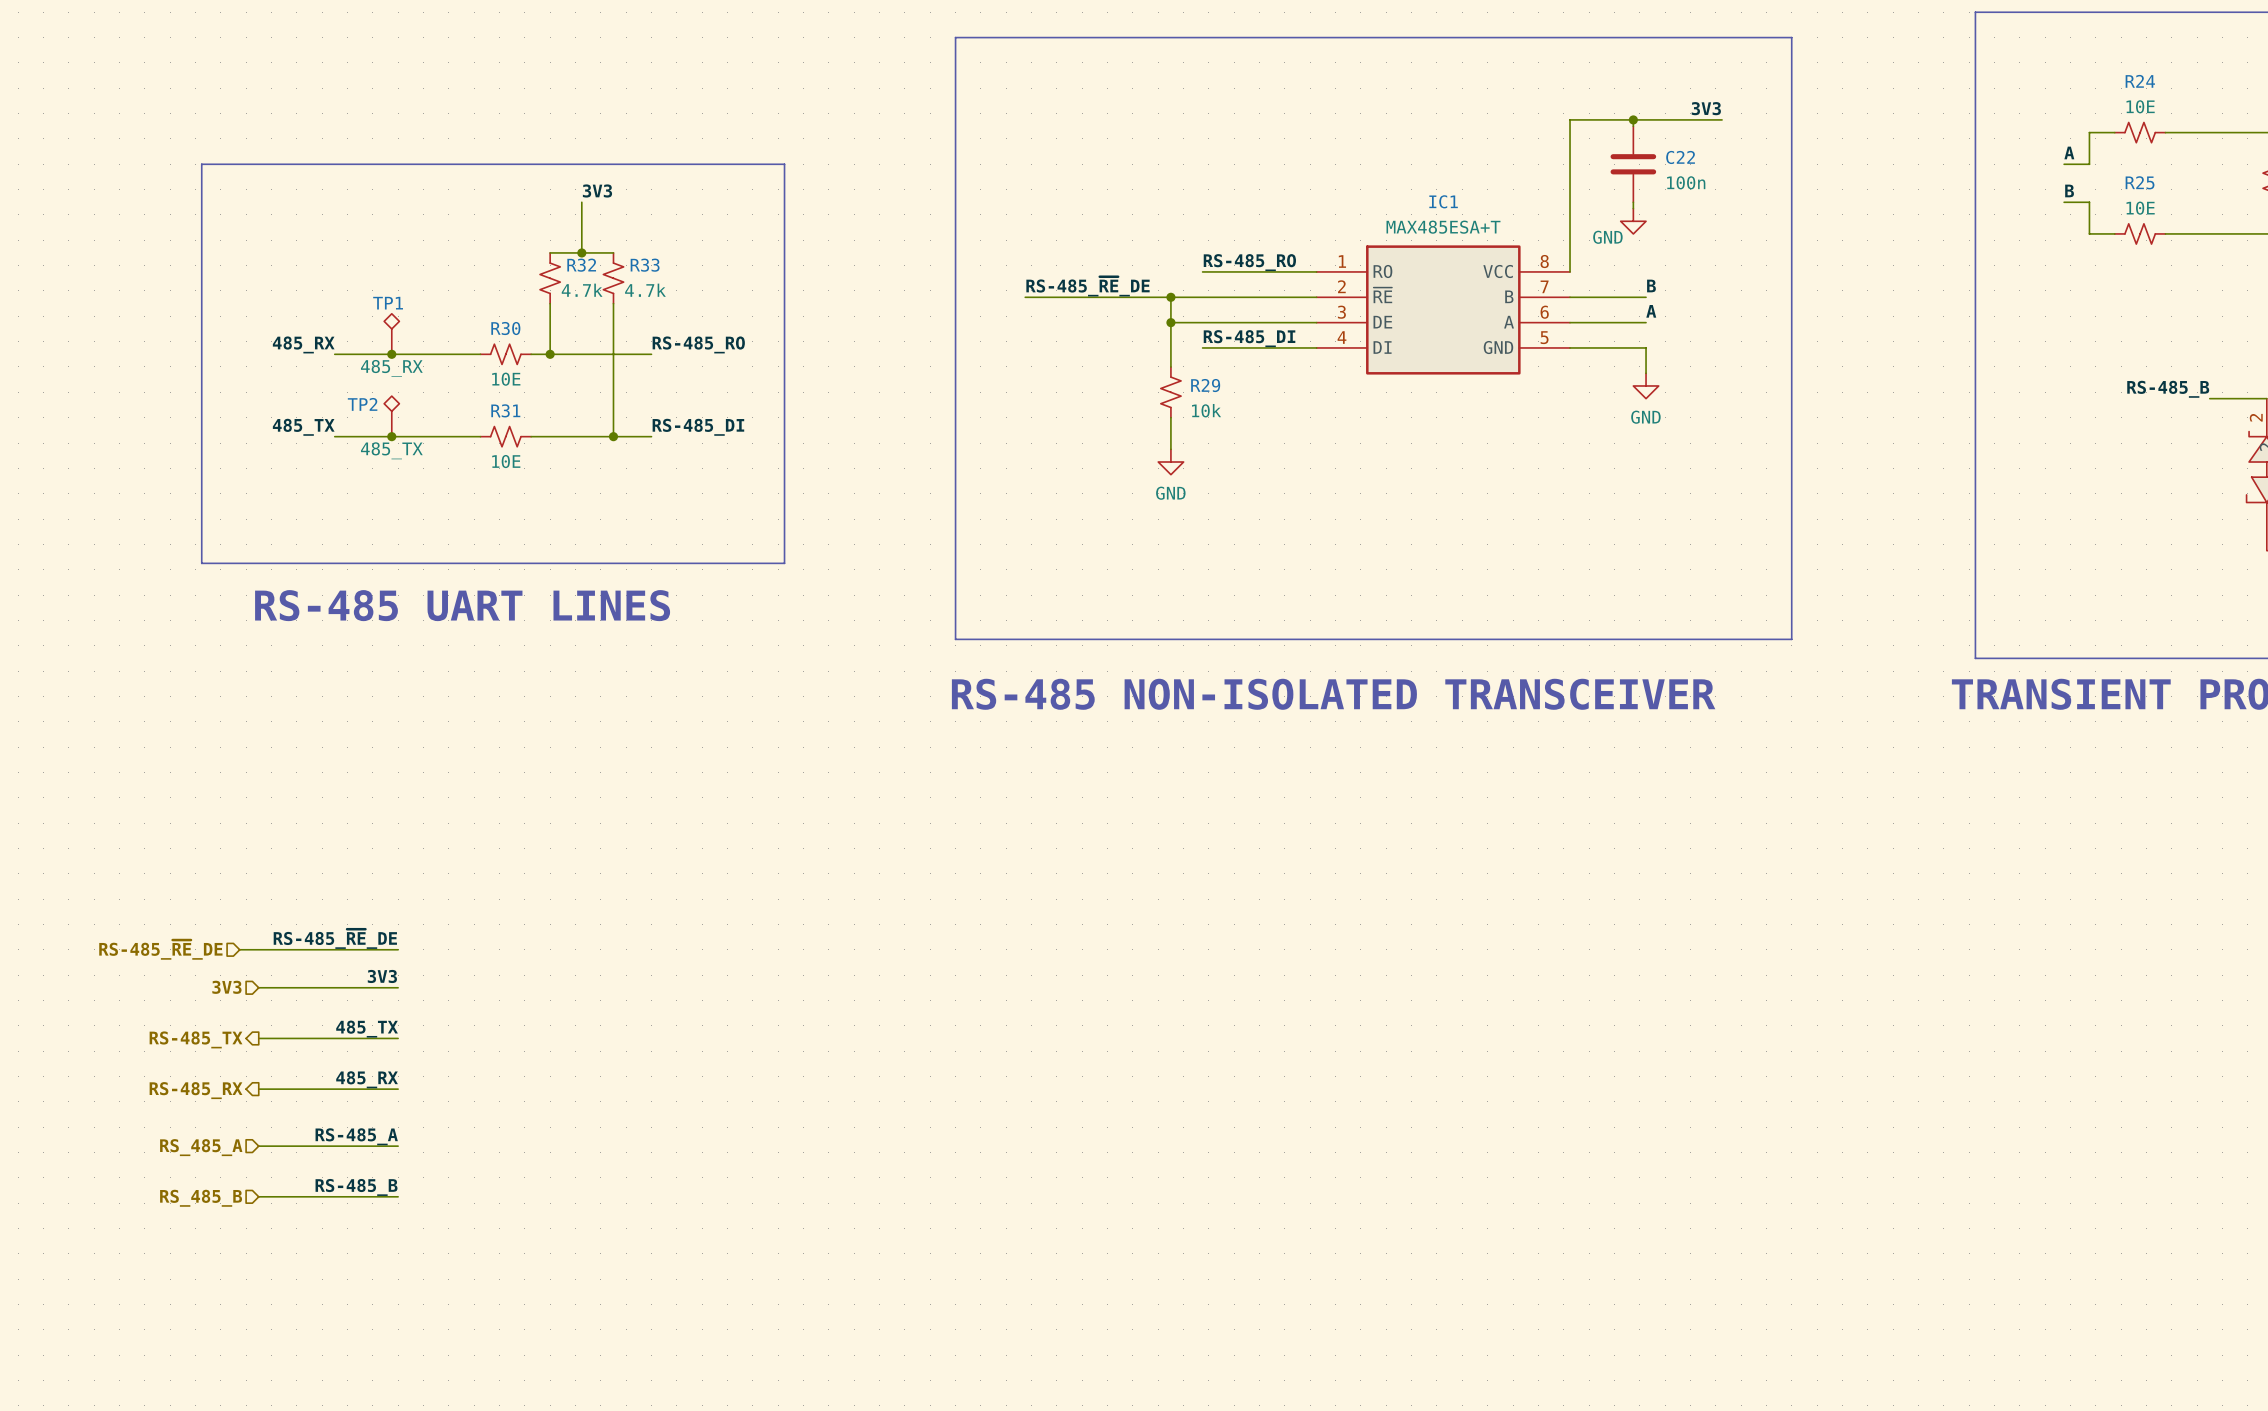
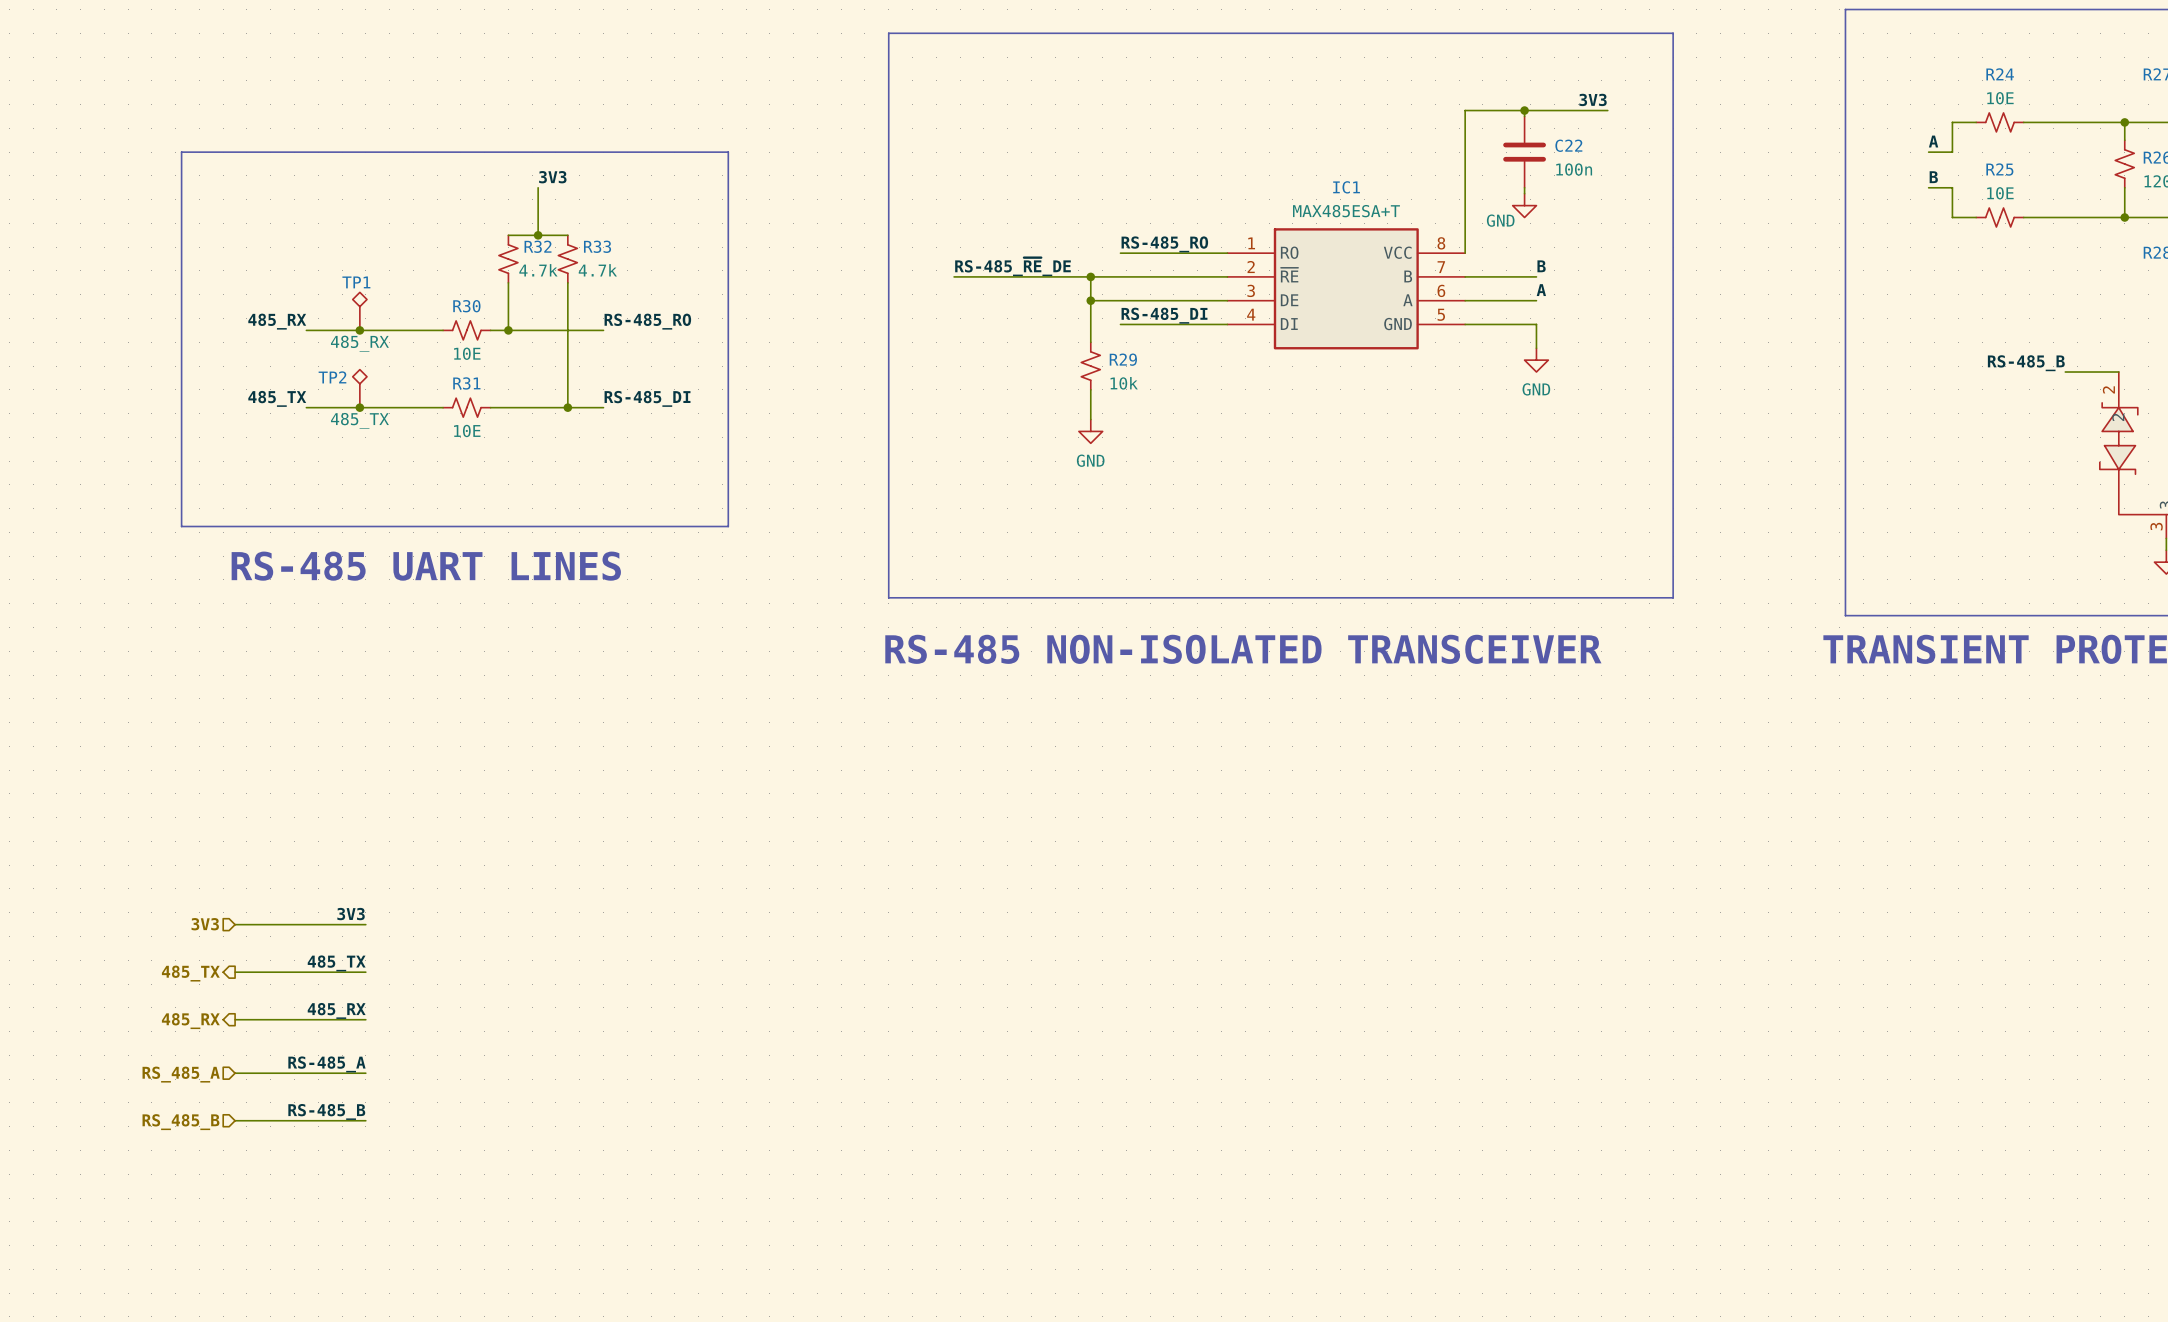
label: RS-485_~{RE}_DE (335, 939) -> none
hierarchical label: RS-485_~{RE}_DE (160, 949) -> none
wire: (239, 949) (398, 949) -> none
hierarchical label: RS-485_TX (196, 1039) -> 485_TX (190, 973)
hierarchical label: RS-485_RX (196, 1090) -> 485_RX (190, 1021)

